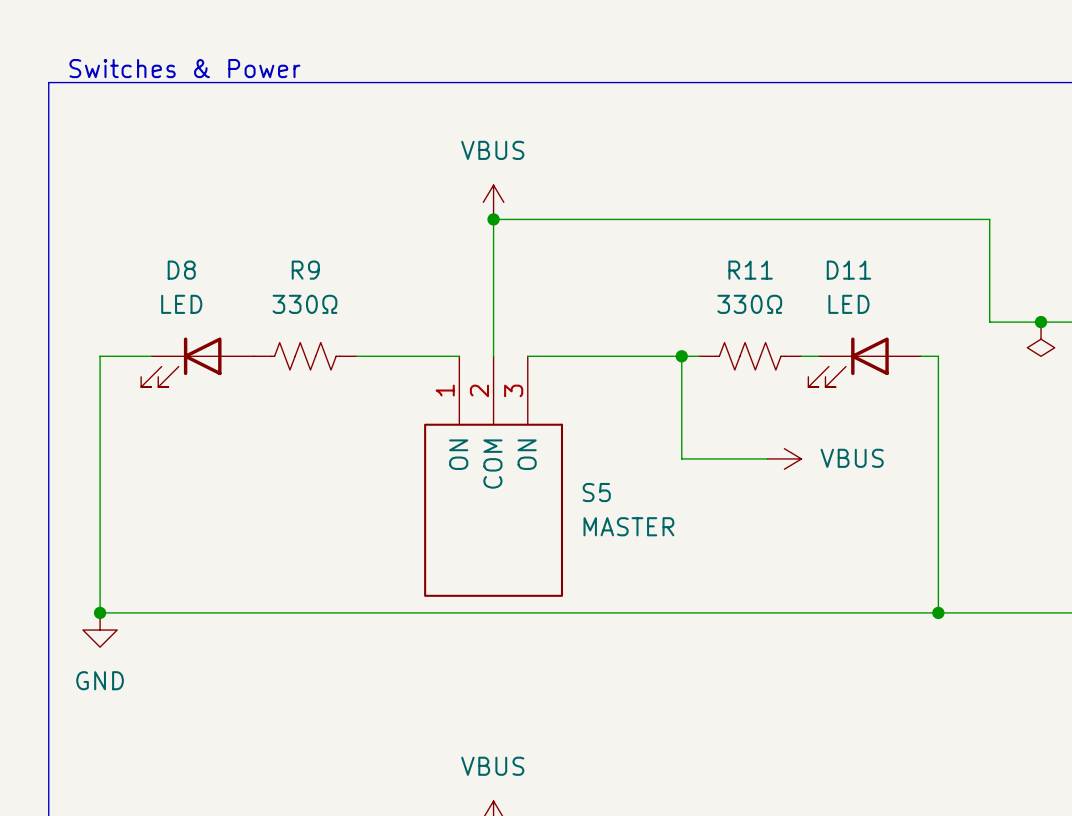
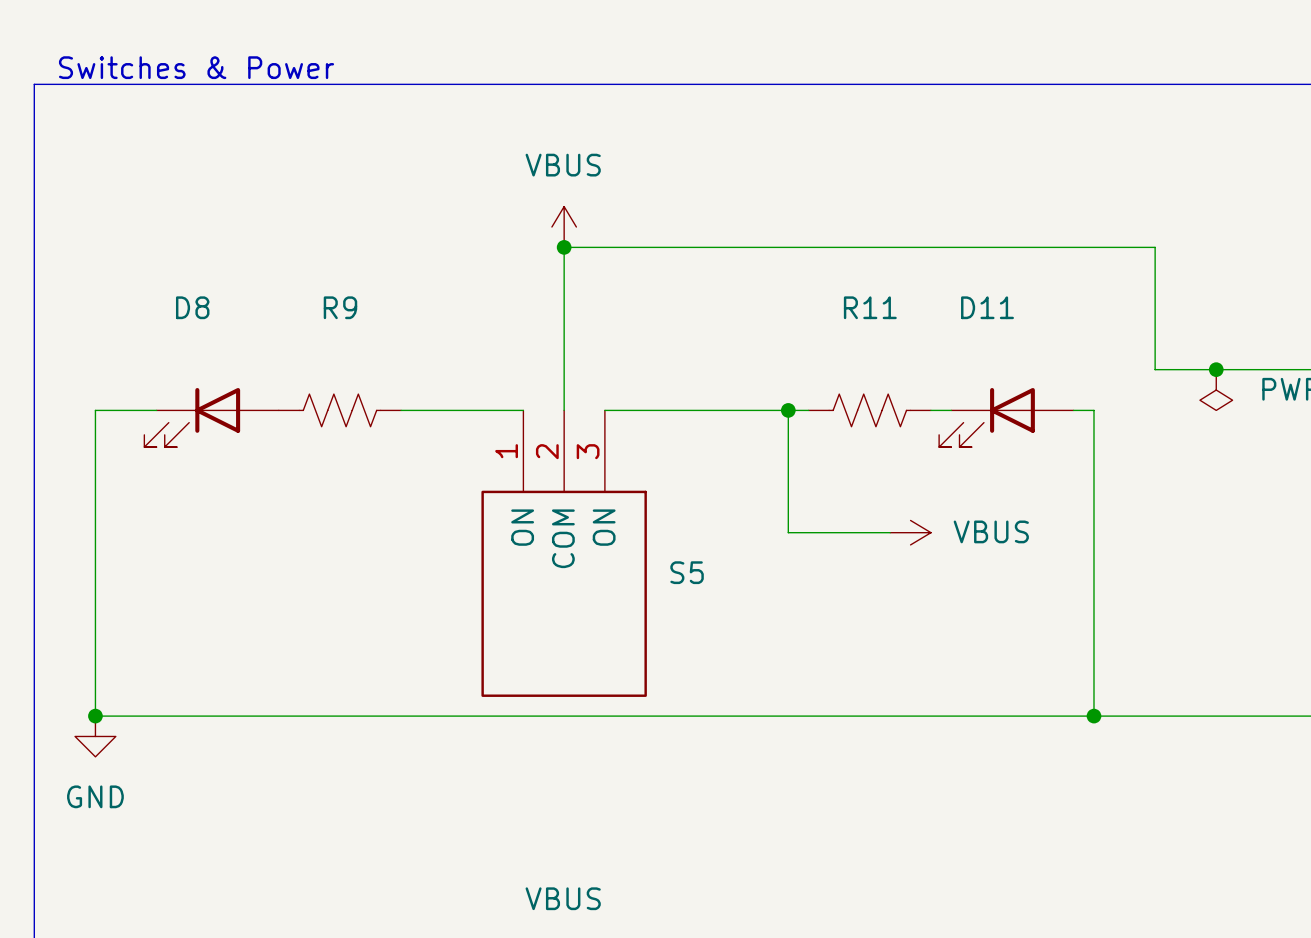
D8 value: LED (181, 304) -> none
R9 value: 330Ω (304, 304) -> none
R11 value: 330Ω (749, 304) -> none
D11 value: LED (848, 304) -> none
S5 value: MASTER (628, 526) -> none

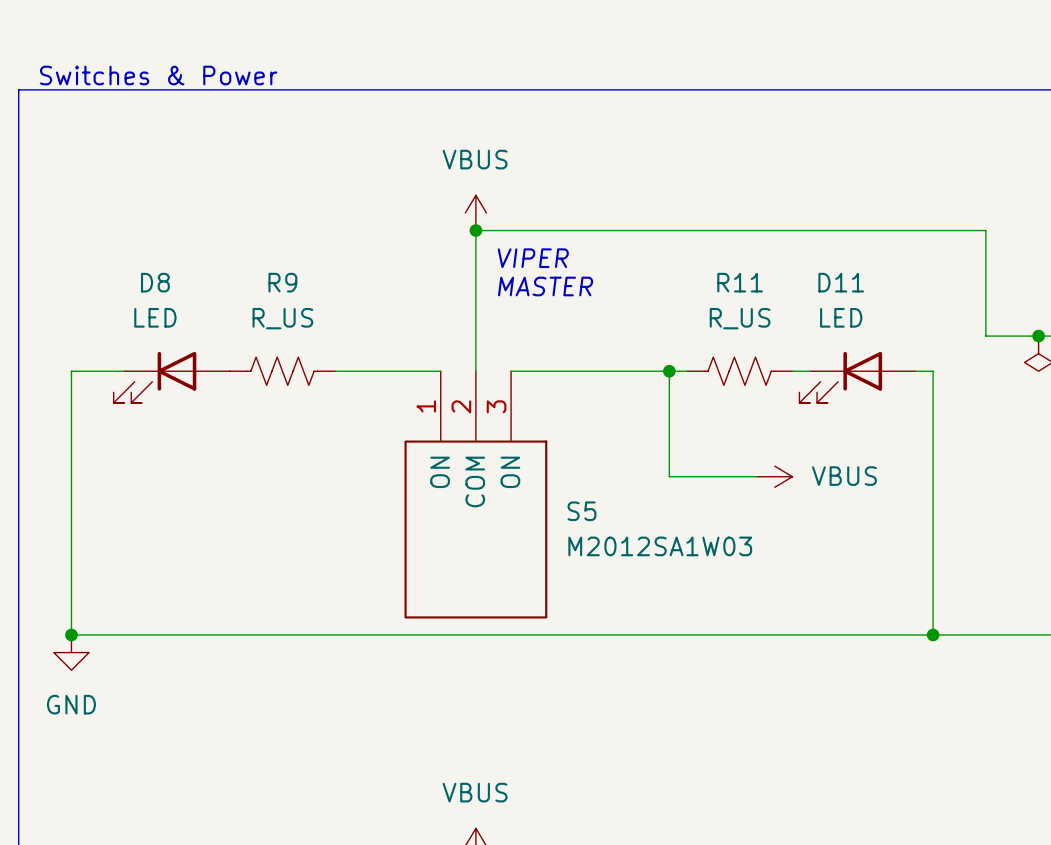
text: none -> VIPER (533, 258)
text: none -> MASTER (545, 286)
D8 value: none -> LED (155, 317)
D11 value: none -> LED (841, 317)
R9 value: none -> R_US (282, 318)
R11 value: none -> R_US (740, 318)
S5 value: none -> M2012SA1W03 (660, 546)

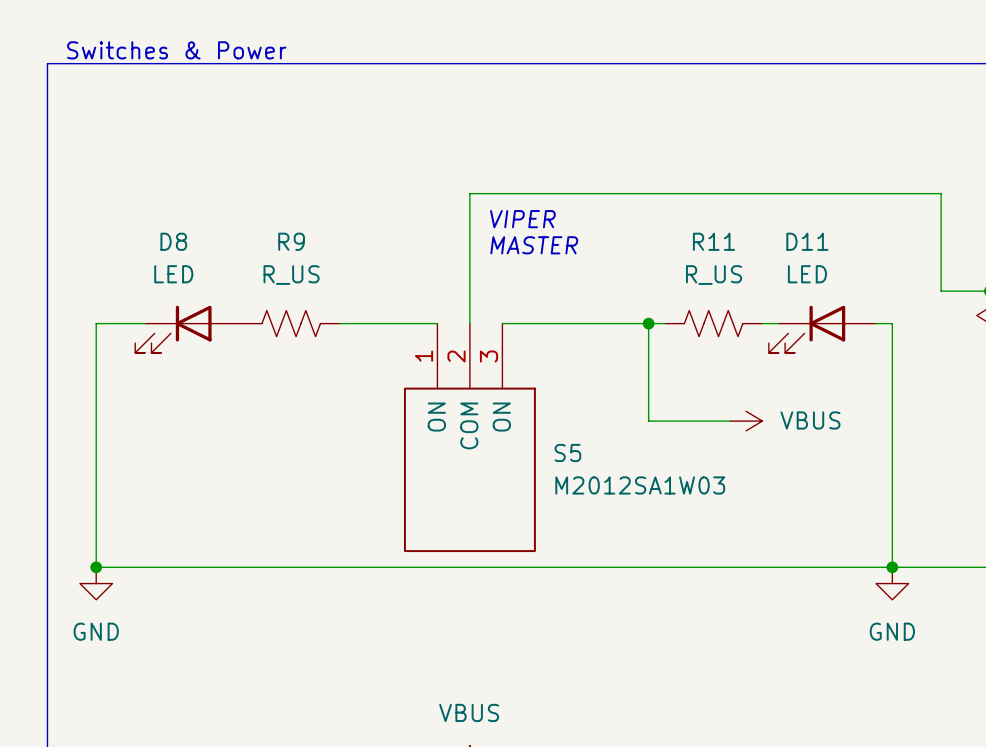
power symbol: VBUS (475, 212) -> none
junction: (475, 230) -> none
power symbol: none -> GND (892, 583)

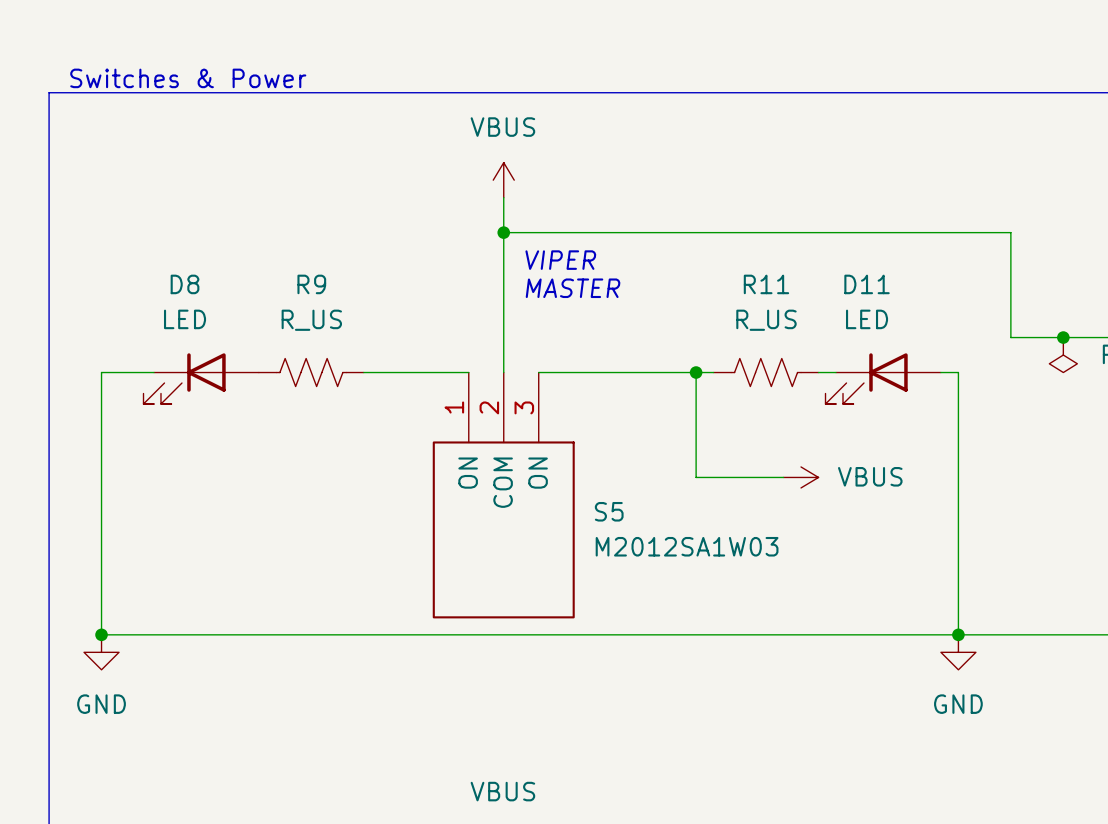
power symbol: none -> VBUS (503, 180)
wire: none -> (503, 197) (503, 232)
junction: none -> (503, 232)

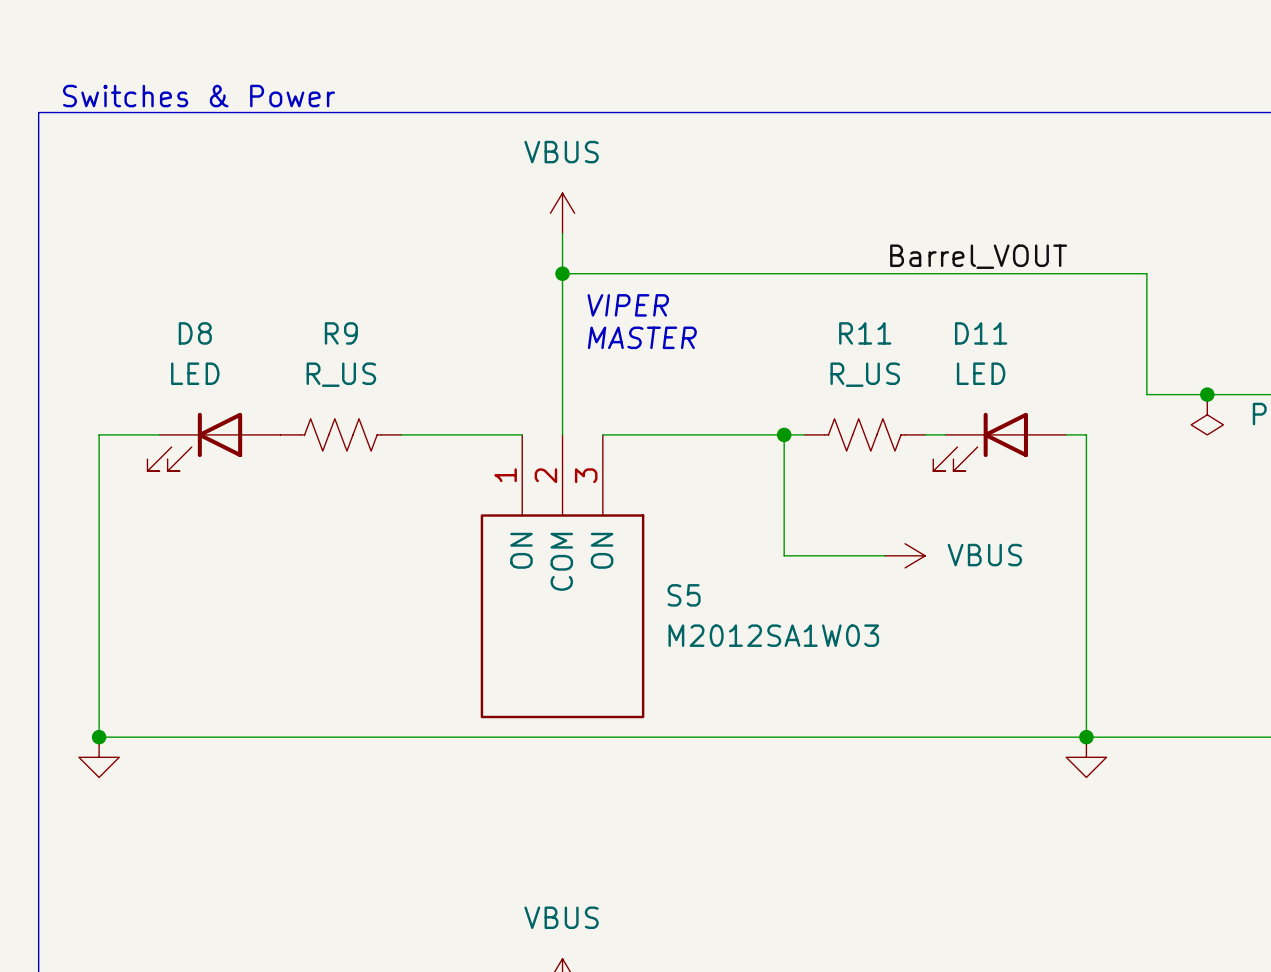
label: none -> Barrel_VOUT (978, 256)
power symbol text: GND (101, 704) -> none
power symbol text: GND (958, 704) -> none

